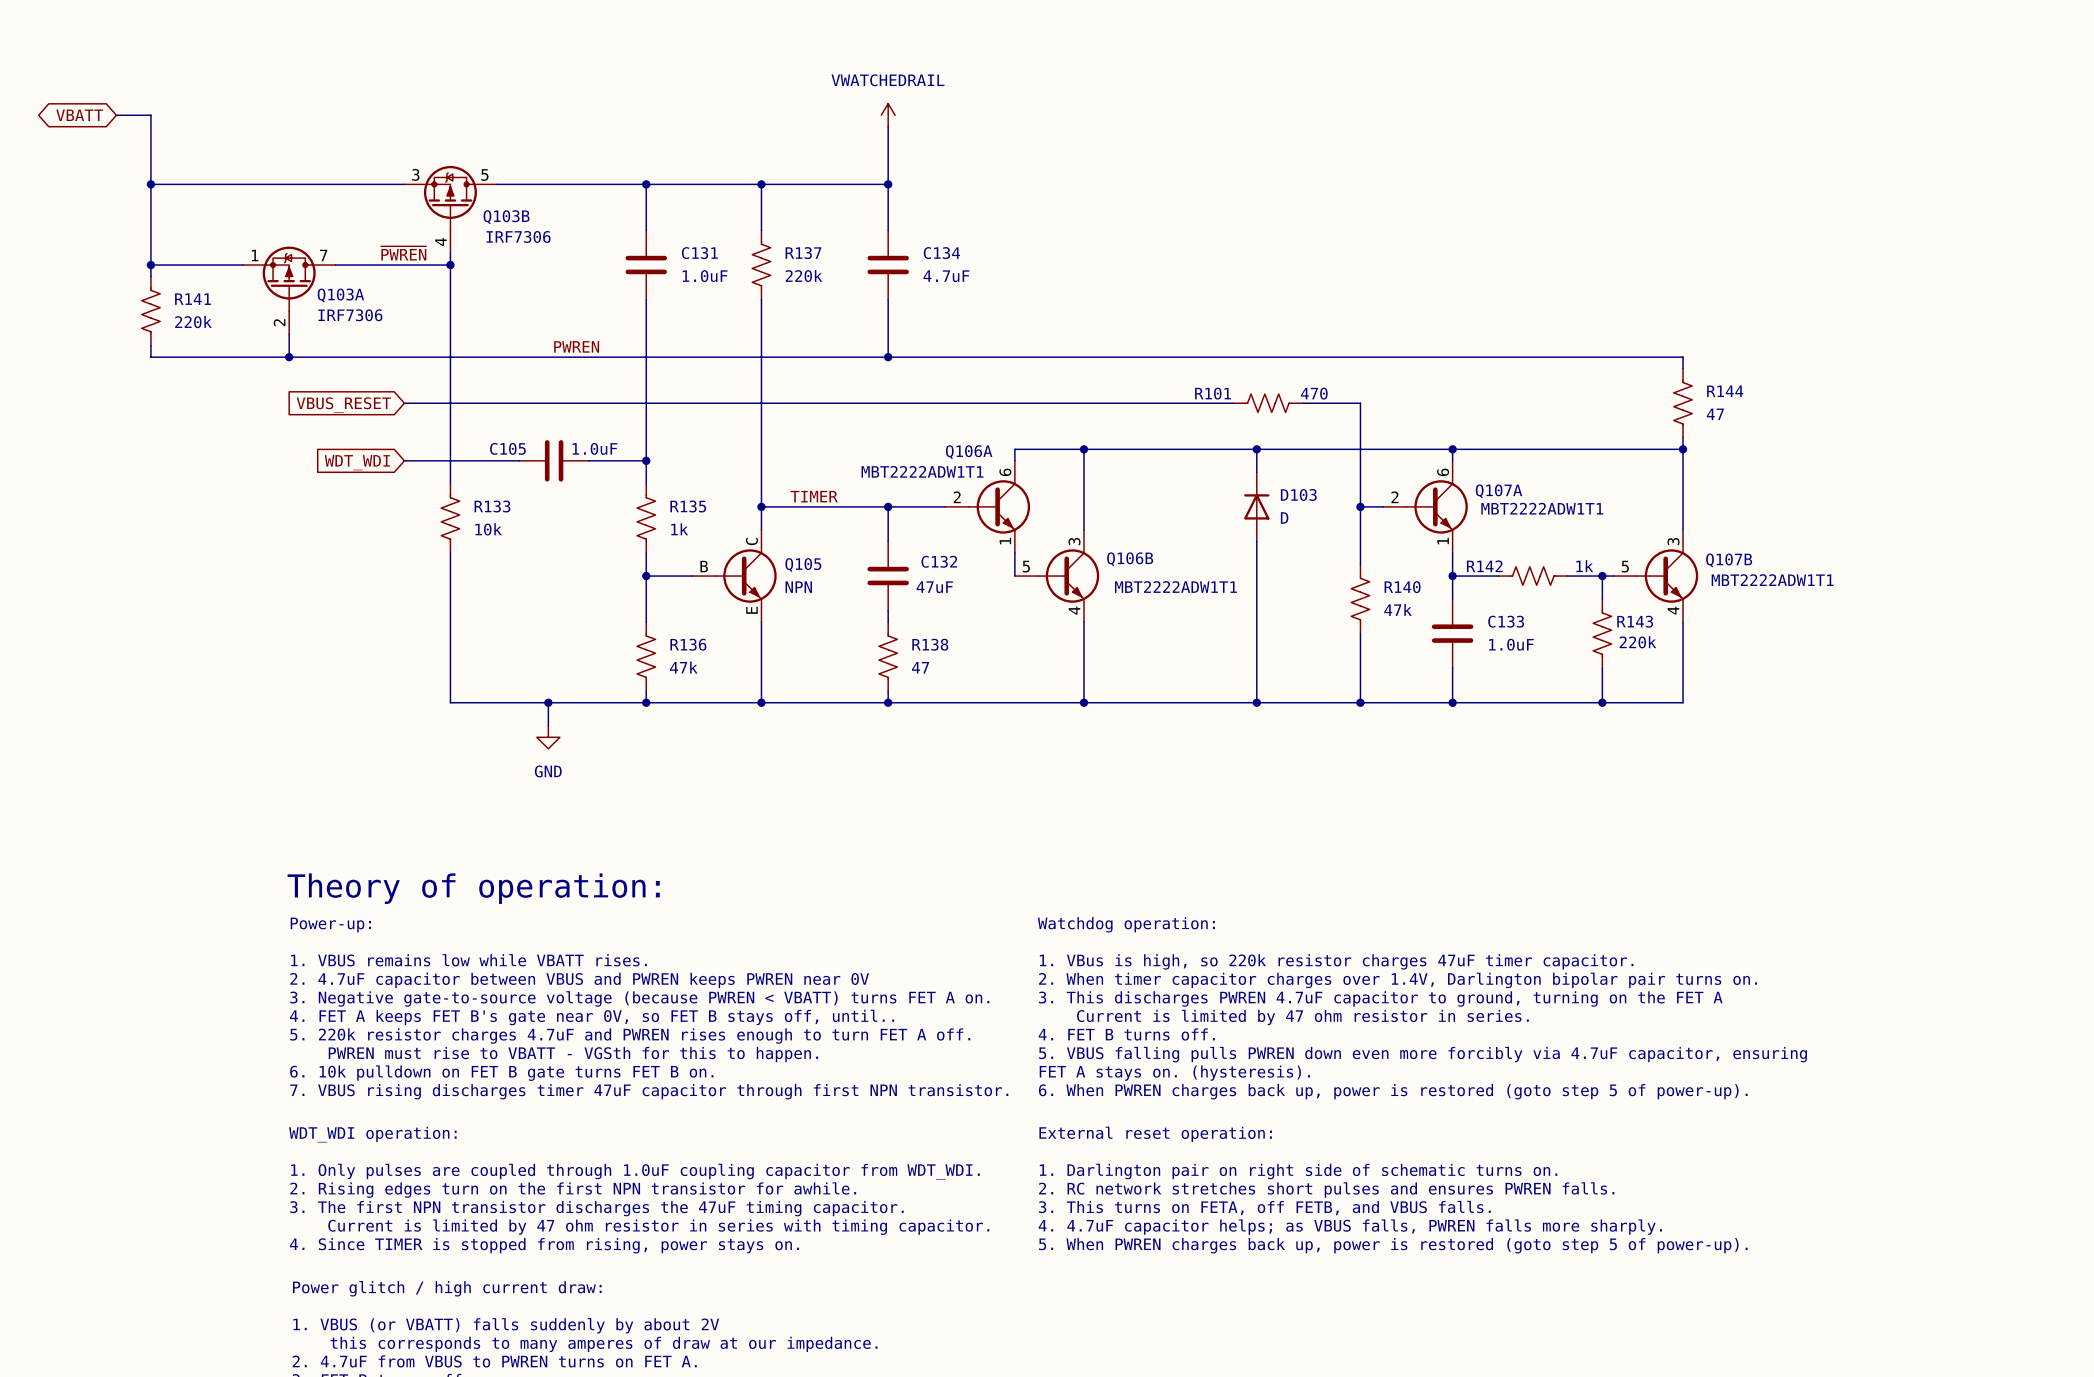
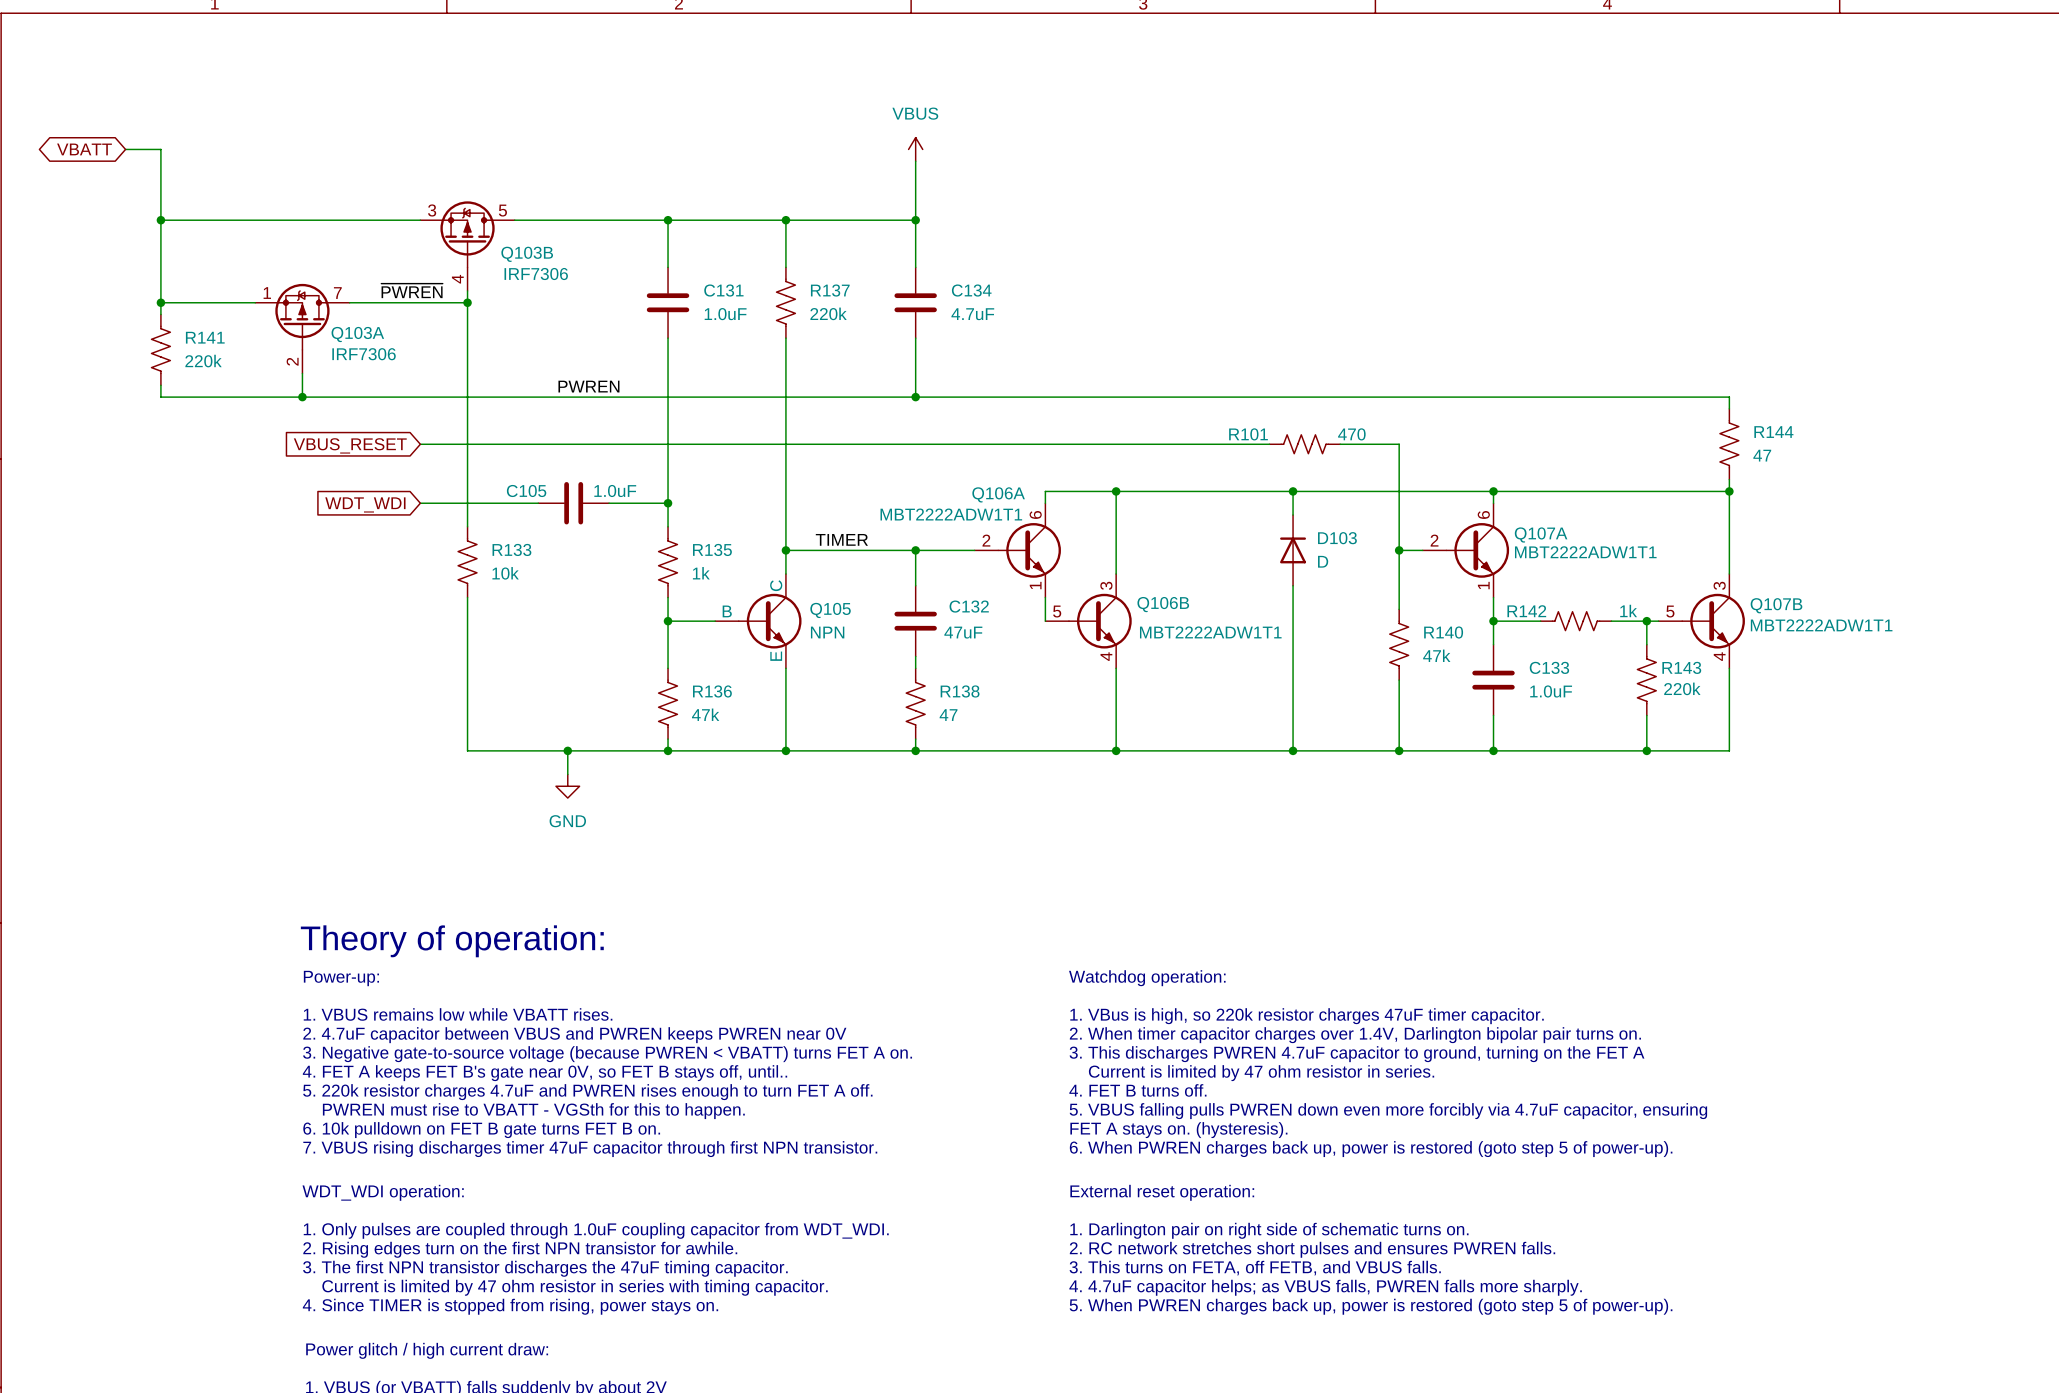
power symbol: VWATCHEDRAIL (888, 115) -> VBUS (915, 149)

